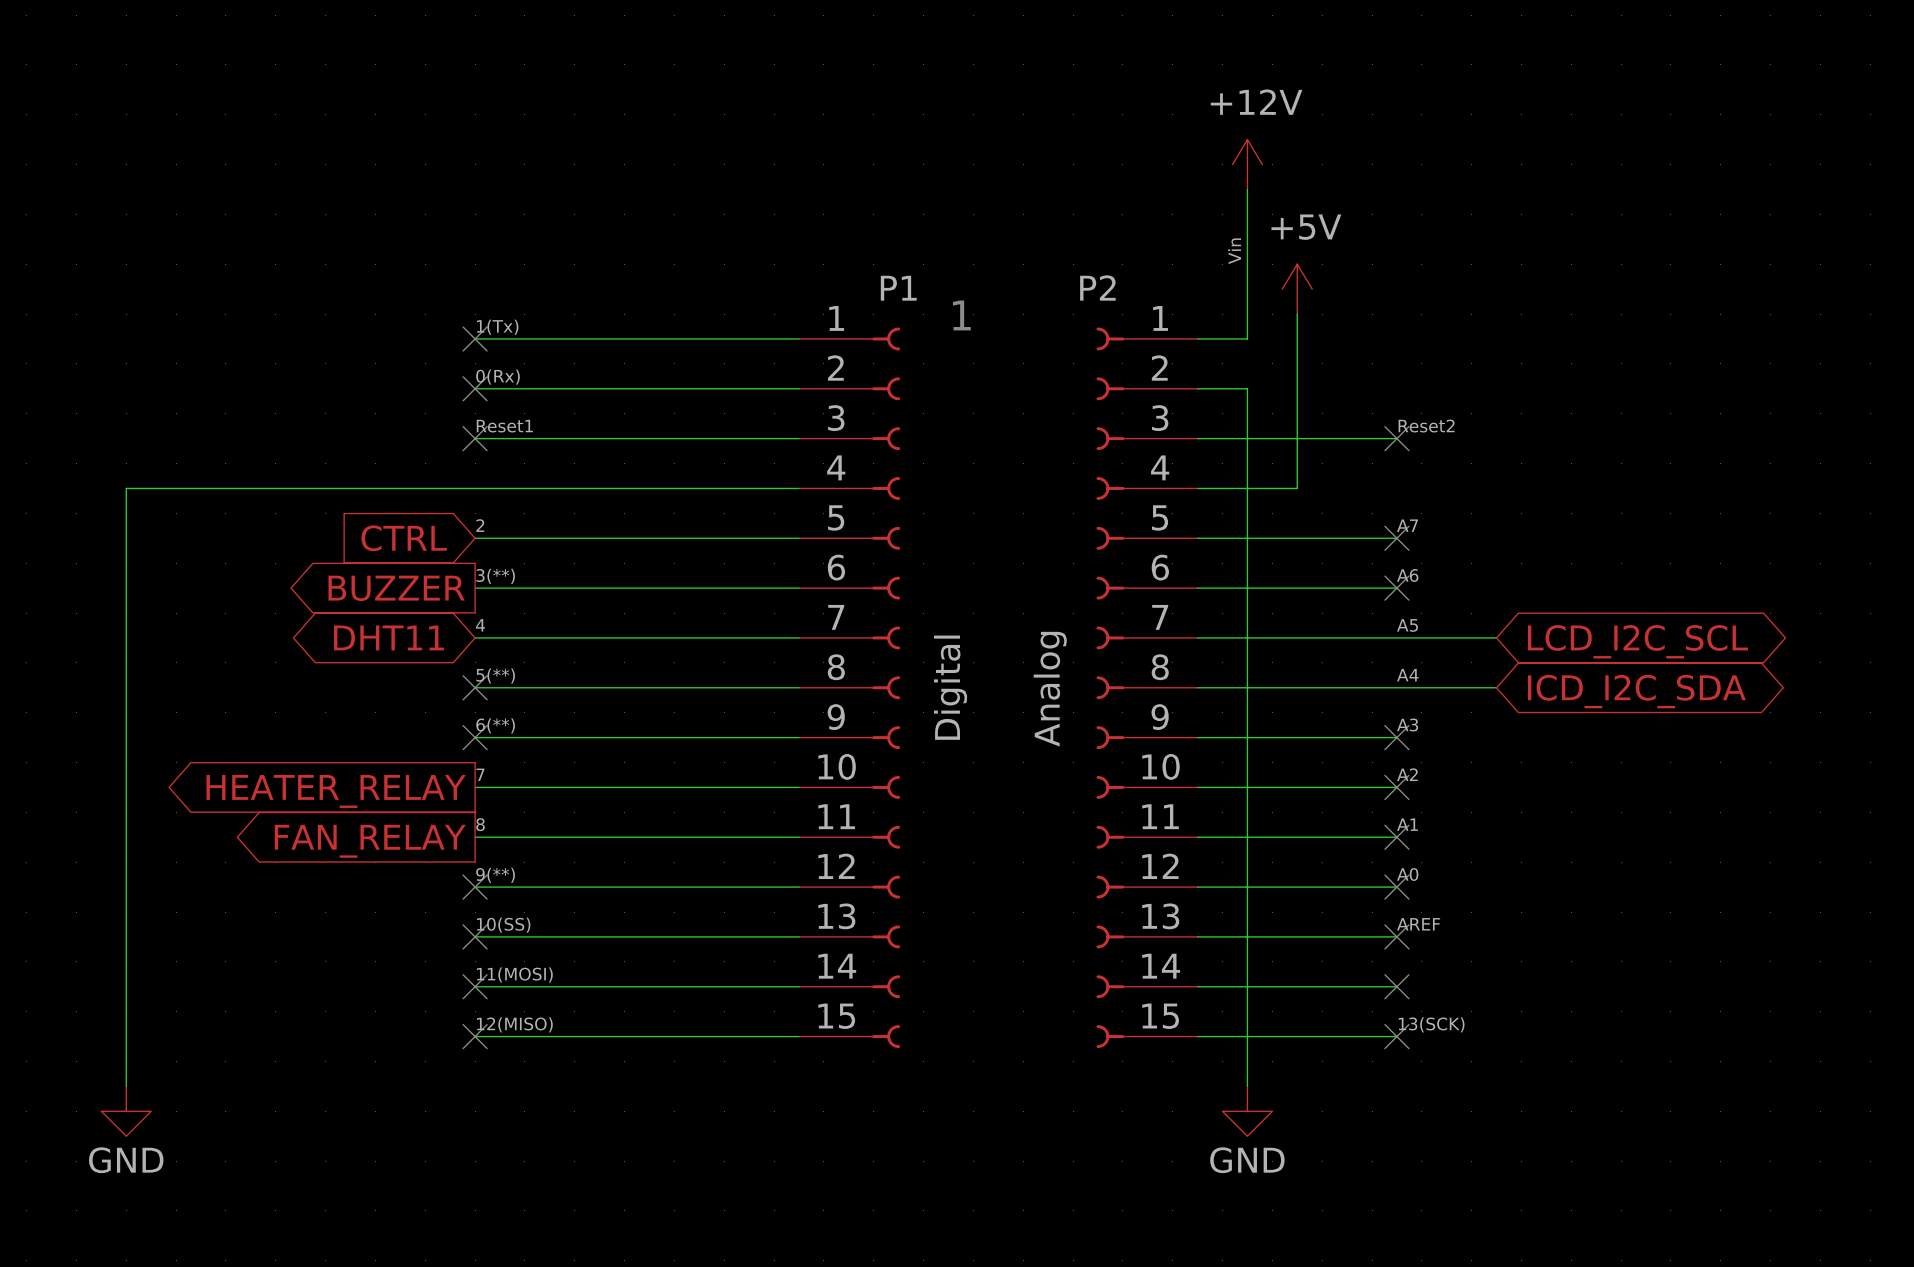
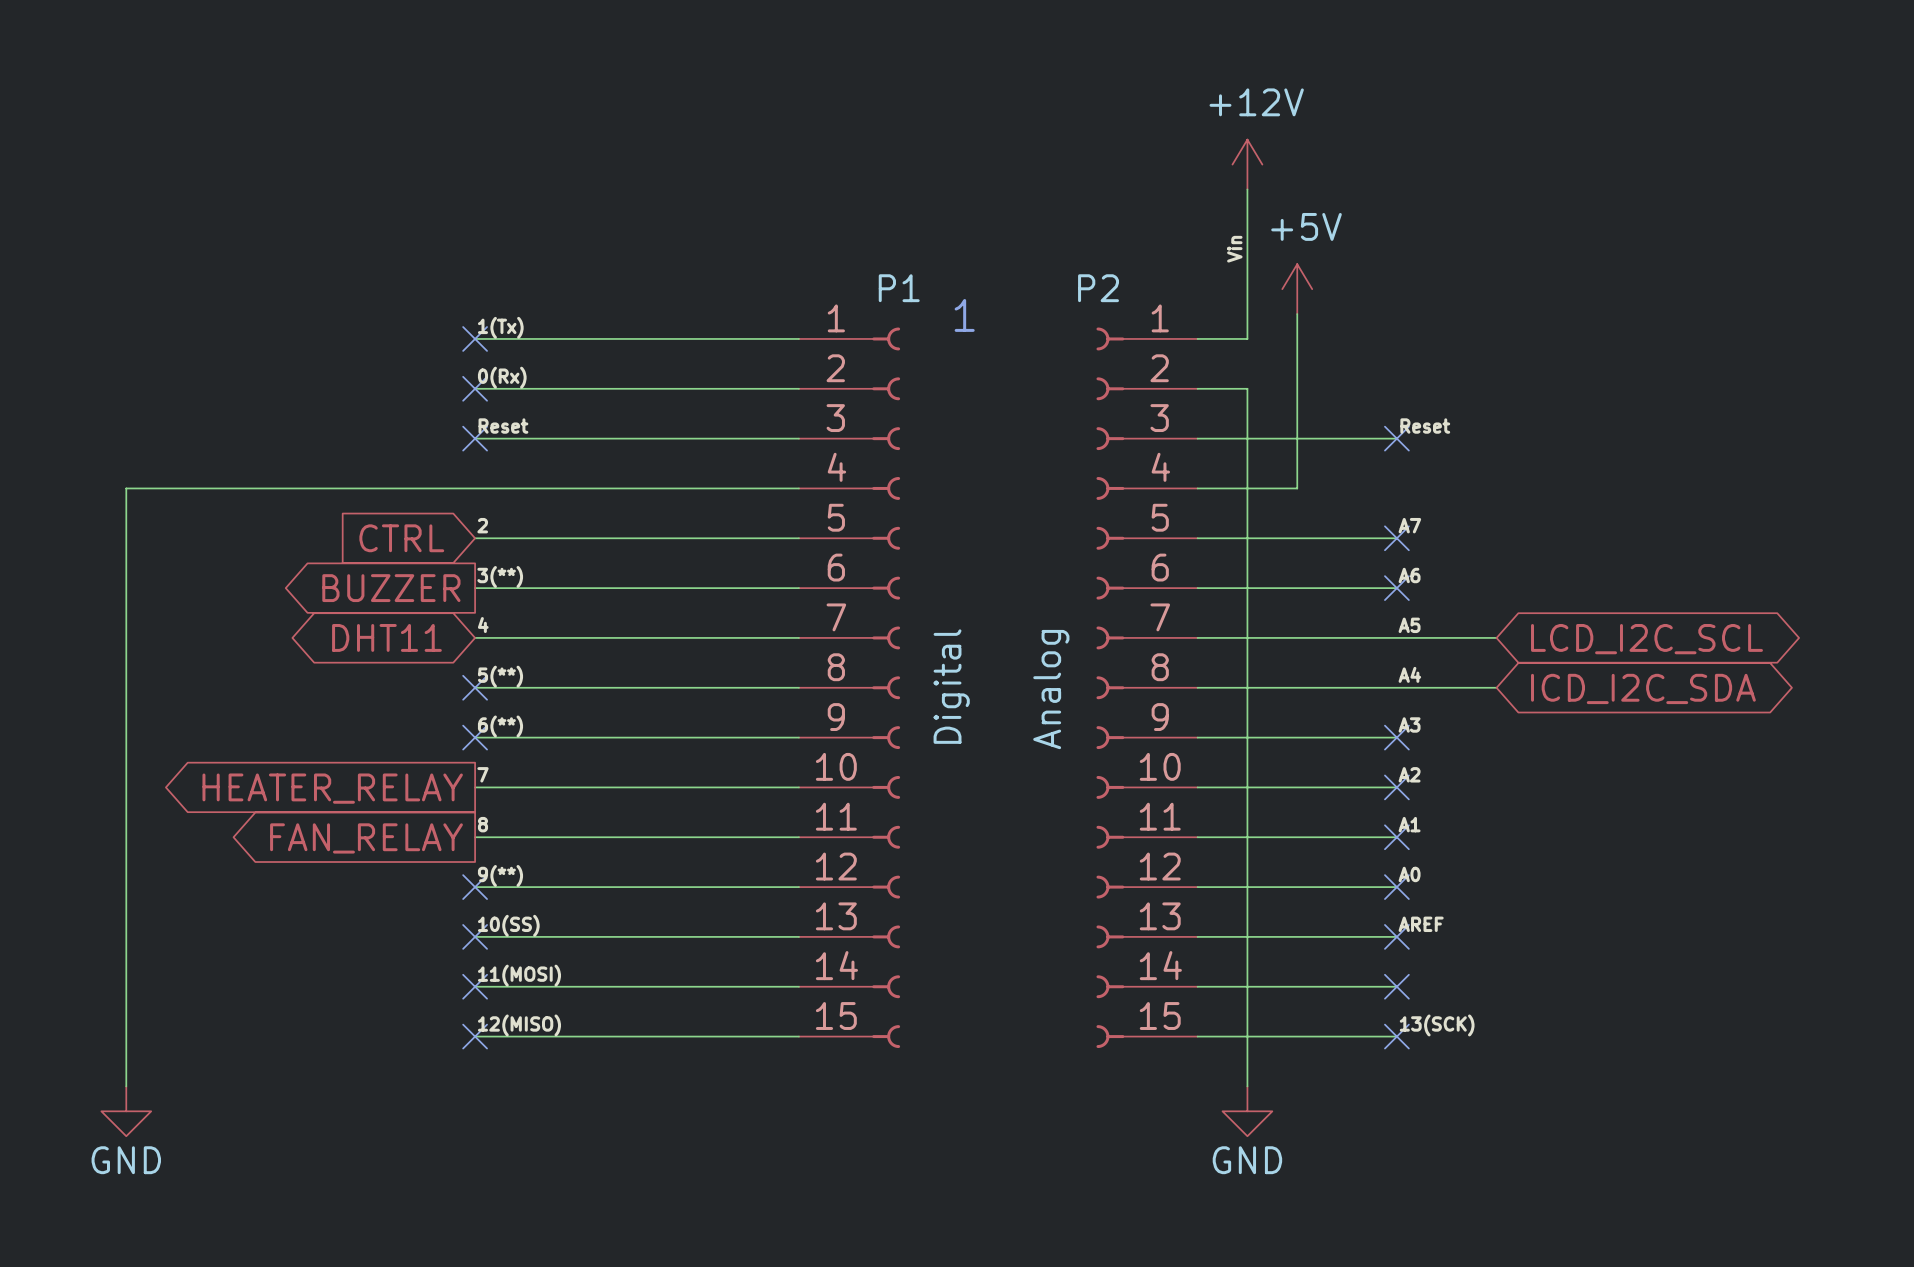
label: Reset1 (504, 426) -> Reset (503, 426)
label: Reset2 (1426, 426) -> Reset (1425, 426)

